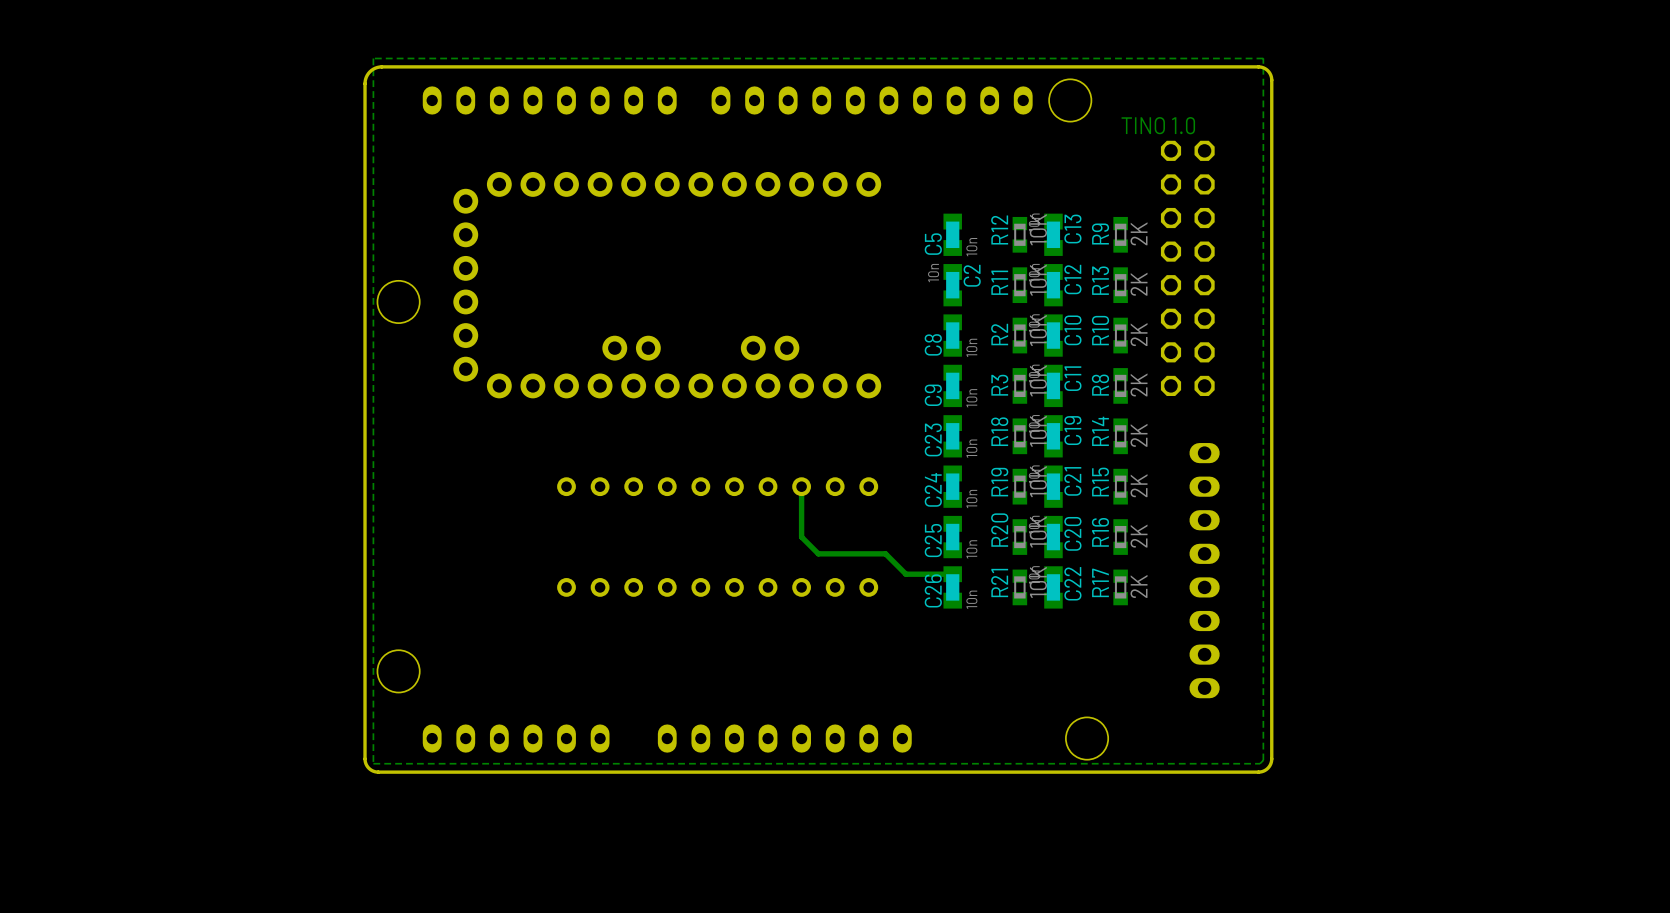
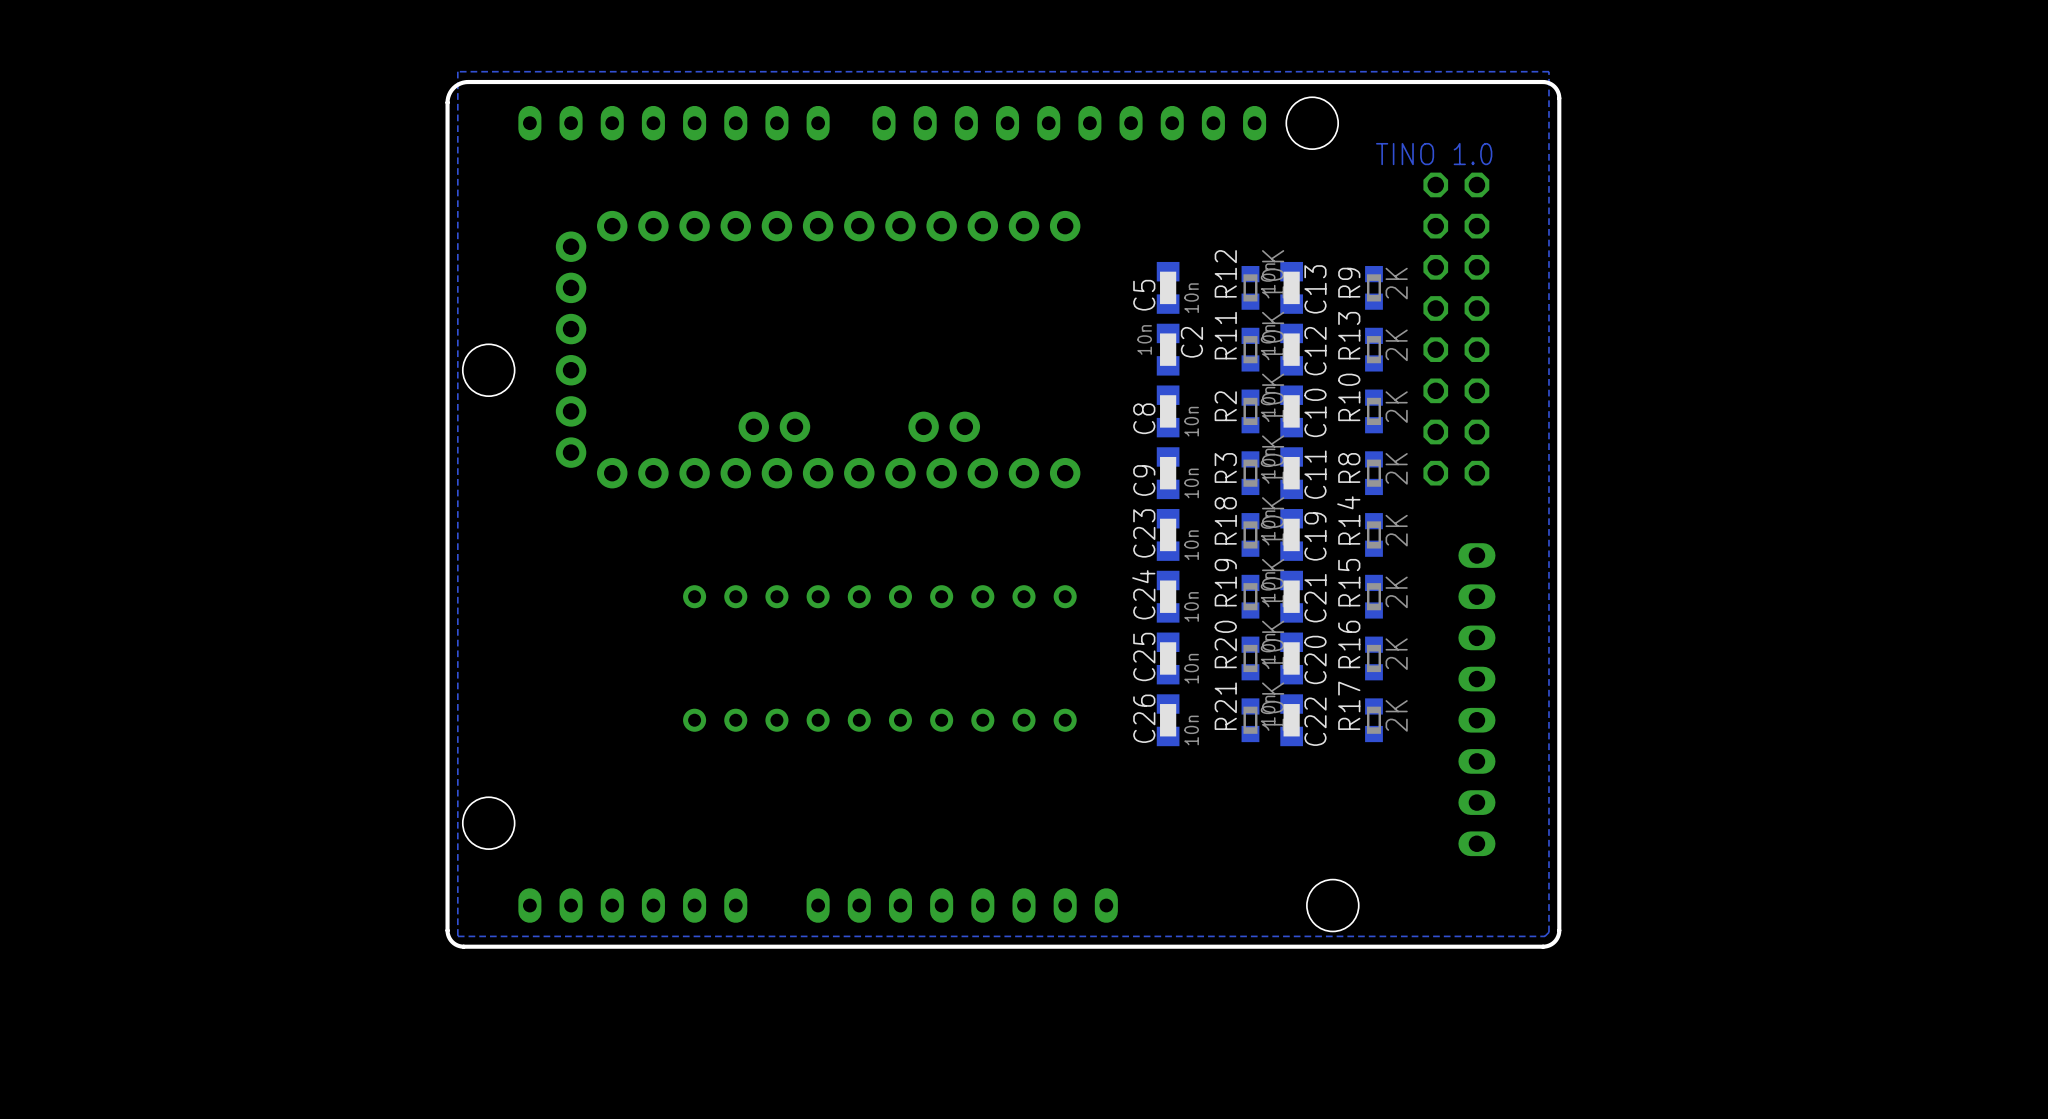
track: (801, 486) (801, 537) (818, 553) (885, 553) (905, 574) (952, 574) -> none

